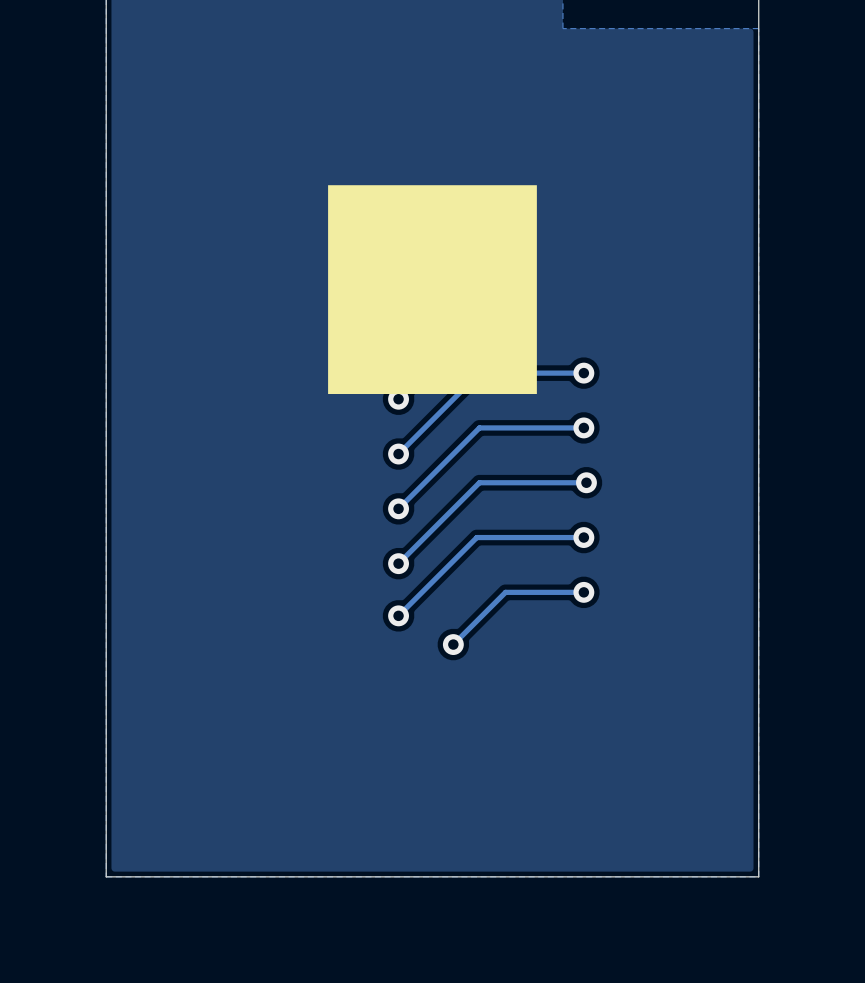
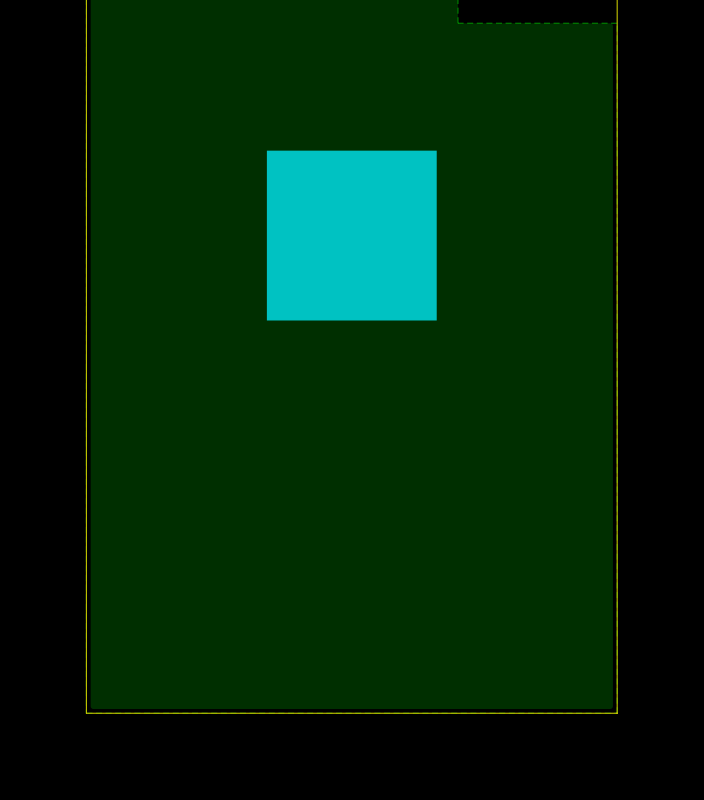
track: (583, 373) (479, 373) (398, 454) -> none
via: (583, 373) -> none
via: (398, 399) -> none
track: (583, 427) (479, 427) (398, 508) -> none
via: (583, 427) -> none
via: (398, 454) -> none
track: (586, 482) (479, 482) (398, 563) -> none
via: (586, 482) -> none
via: (398, 508) -> none
track: (583, 537) (476, 537) (398, 615) -> none
via: (583, 537) -> none
via: (398, 563) -> none
track: (583, 592) (505, 592) (453, 644) -> none
via: (583, 592) -> none
via: (398, 615) -> none
via: (453, 644) -> none

